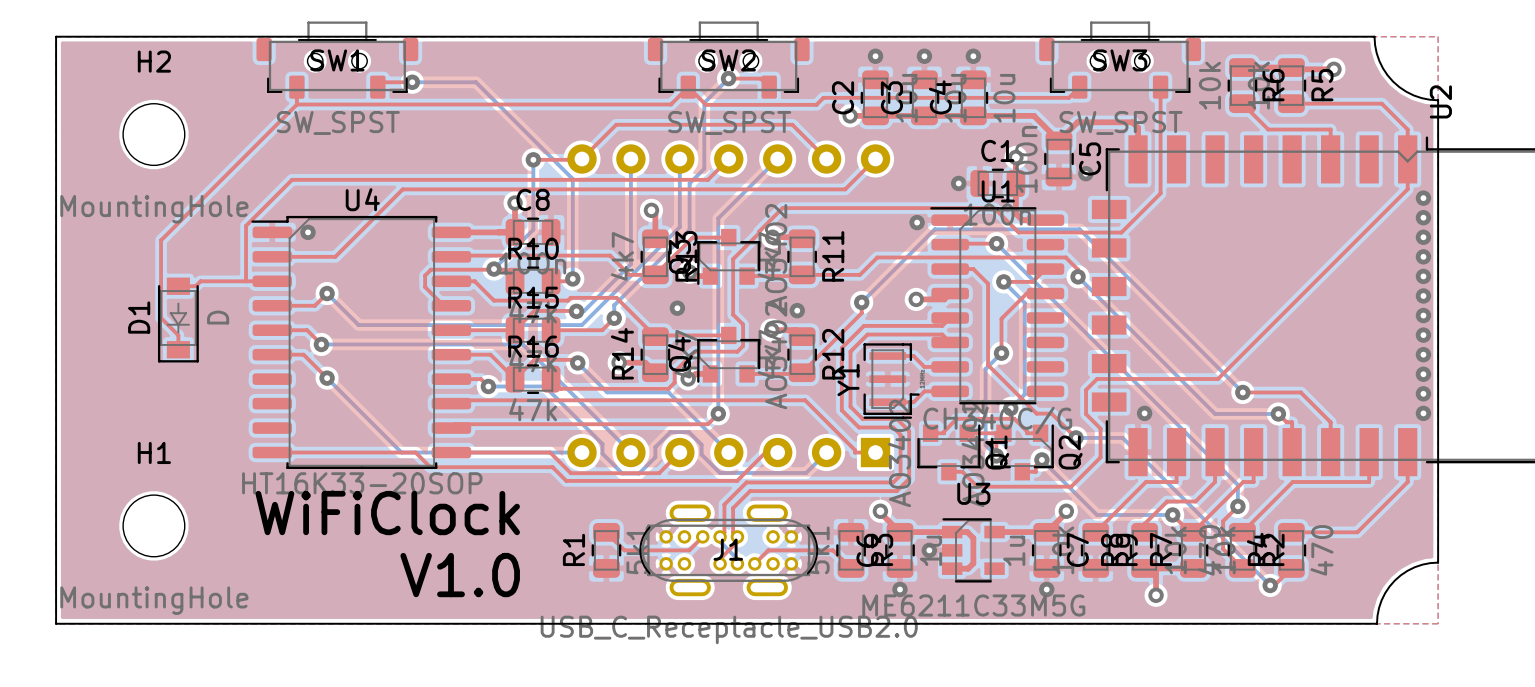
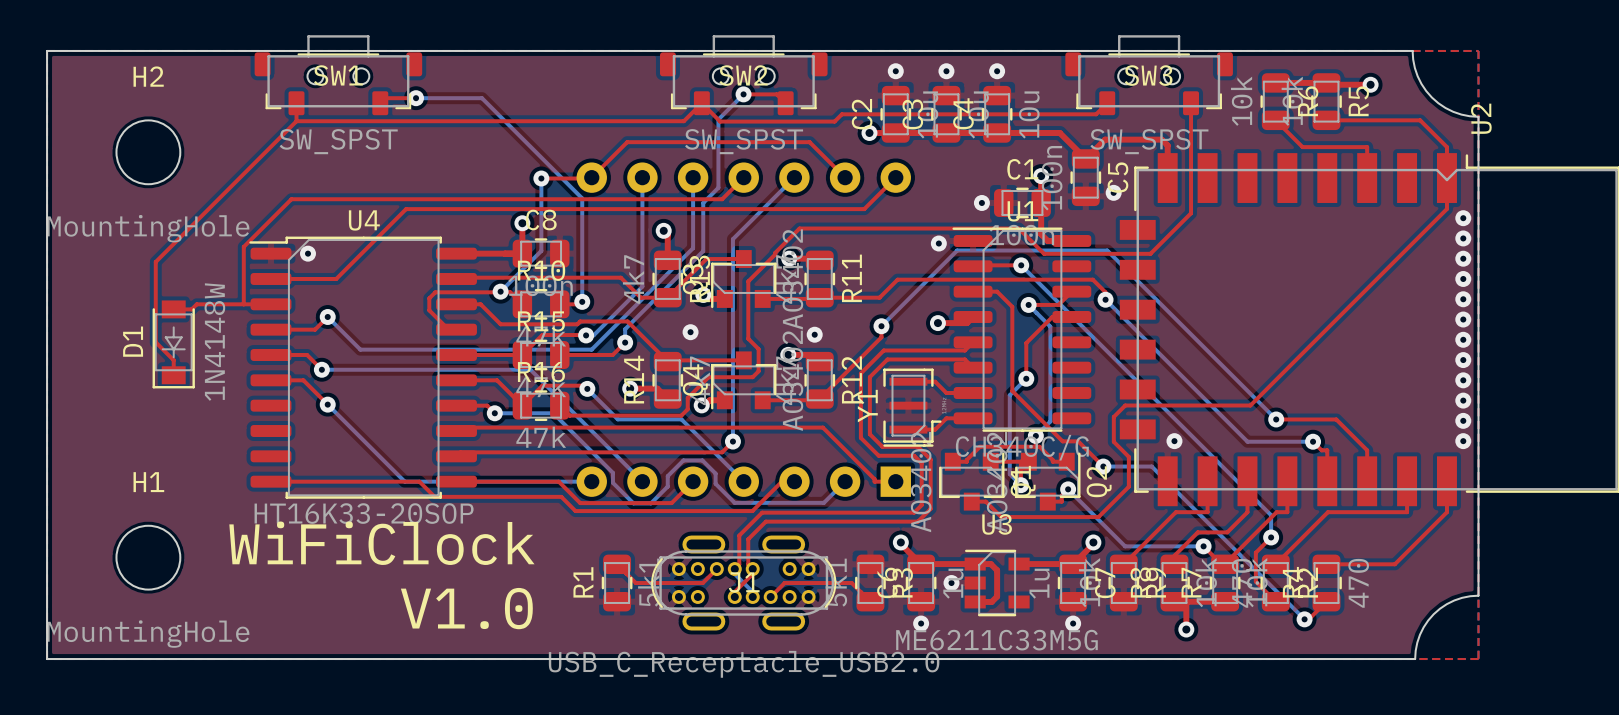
D1 value: D (218, 317) -> 1N4148W (214, 342)

